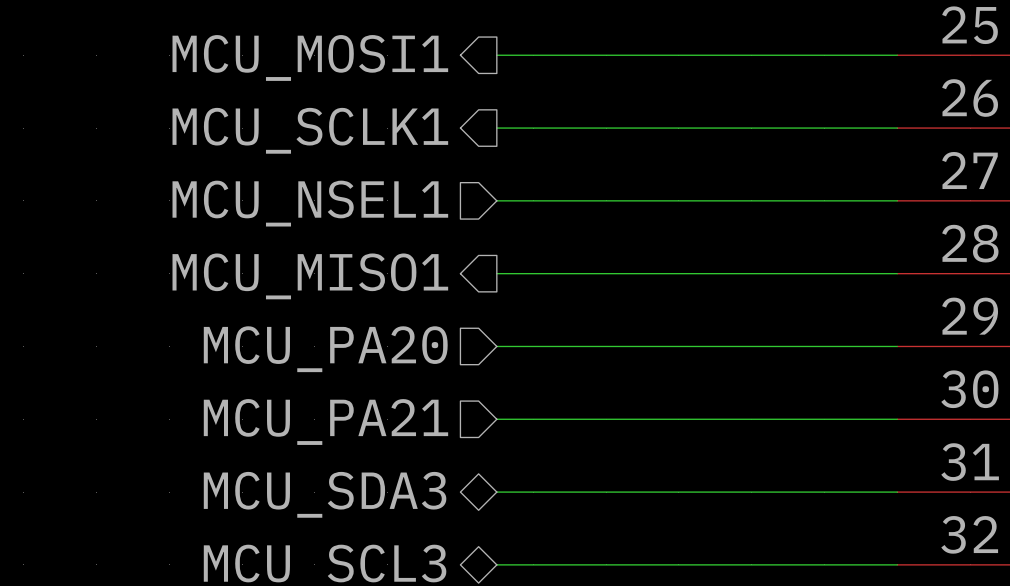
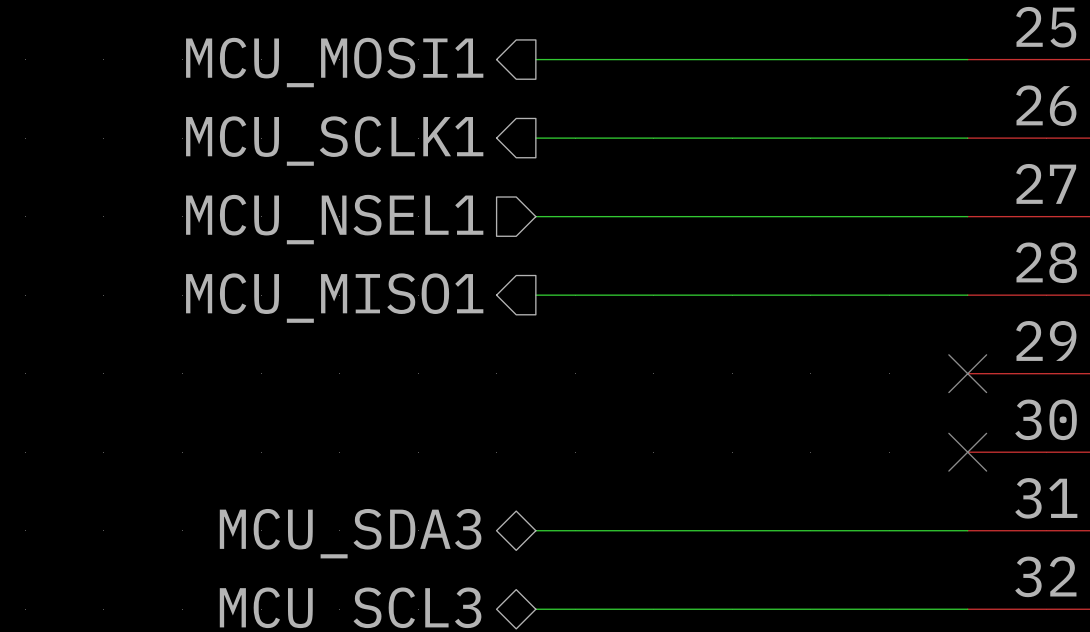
wire: (496, 346) (897, 346) -> none
no-connect mark: none -> (967, 373)
hierarchical label: MCU_PA20 (325, 349) -> none
wire: (496, 419) (897, 419) -> none
no-connect mark: none -> (967, 452)
hierarchical label: MCU_PA21 (325, 422) -> none

